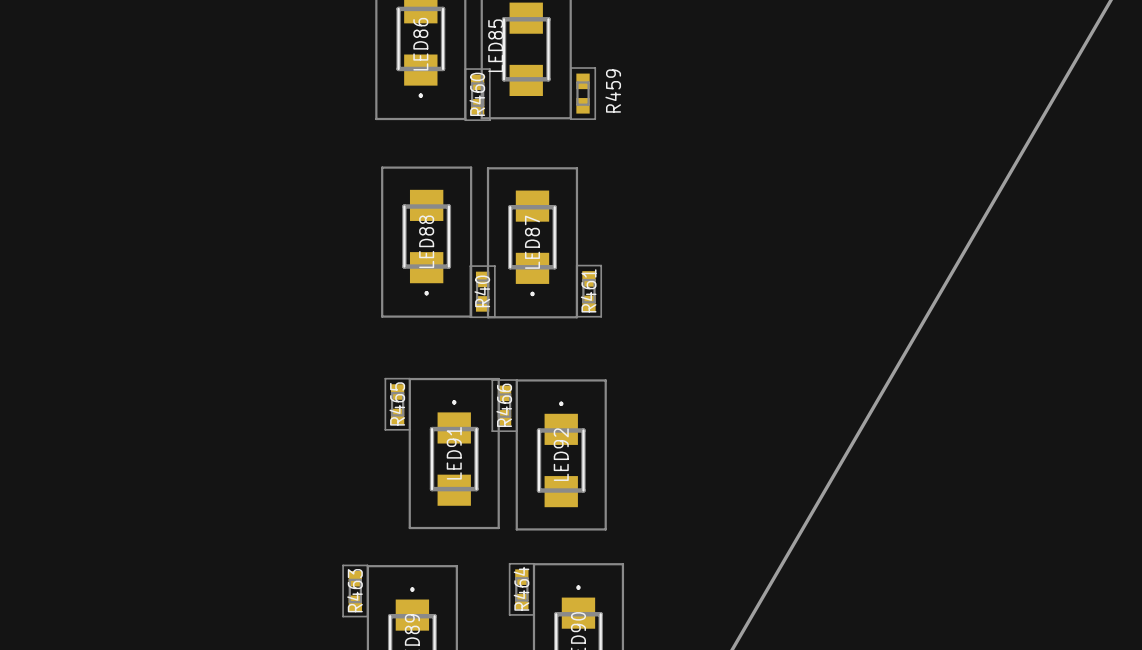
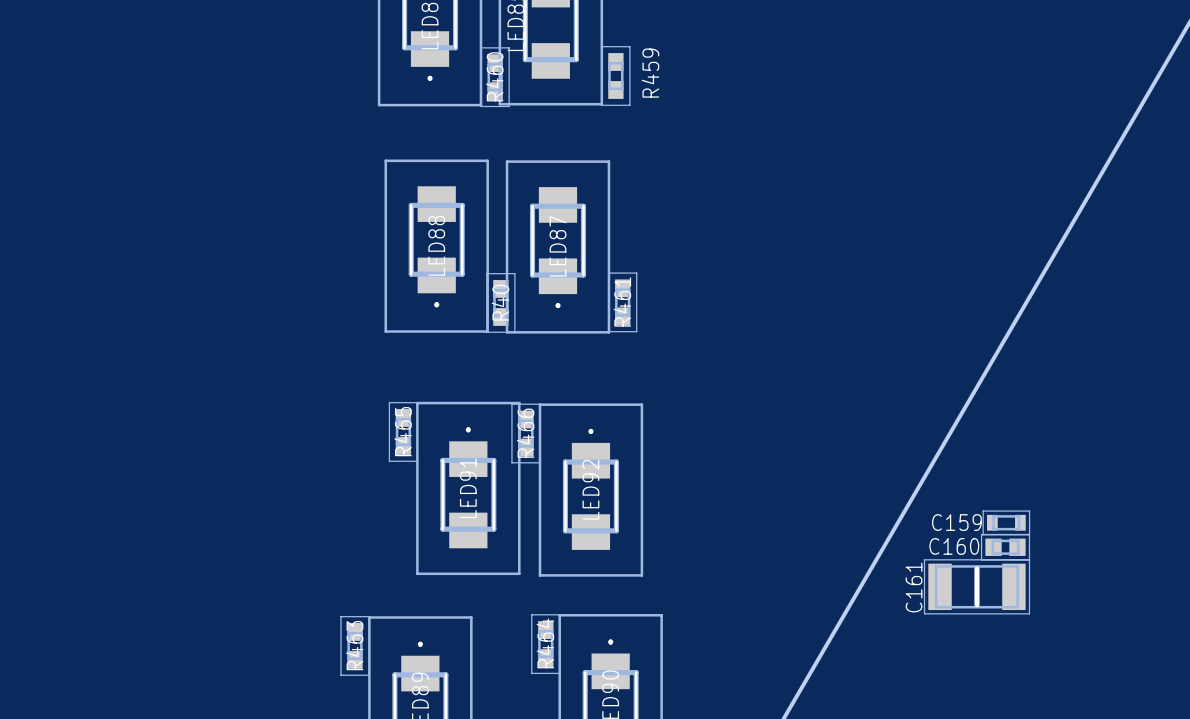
C159: none -> (1006, 522)
C160: none -> (1005, 547)
C161: none -> (976, 586)

